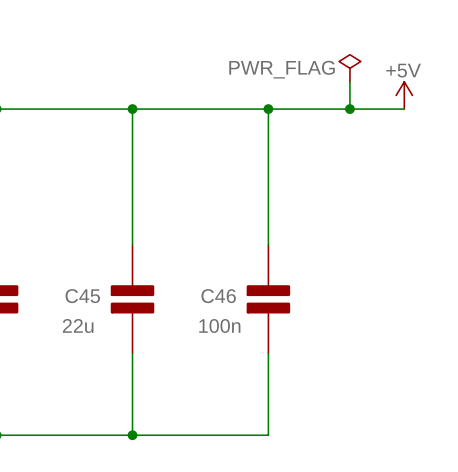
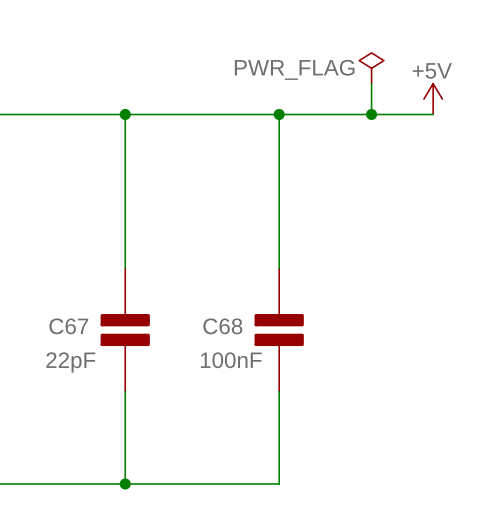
C45 name: C45 (82, 296) -> C67 (68, 326)
C46 name: C46 (218, 296) -> C68 (222, 326)
C45 value: 22u (78, 326) -> 22pF (70, 362)
C46 value: 100n (219, 326) -> 100nF (231, 360)

